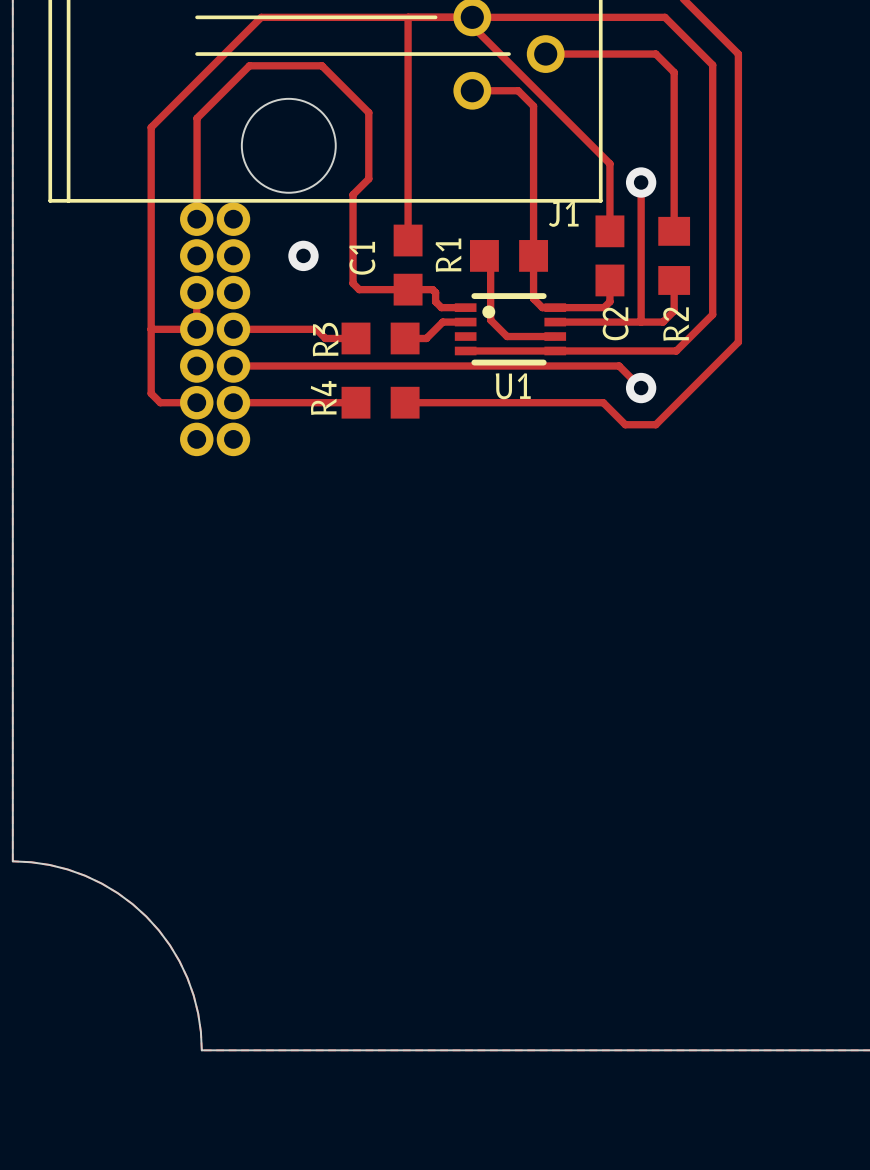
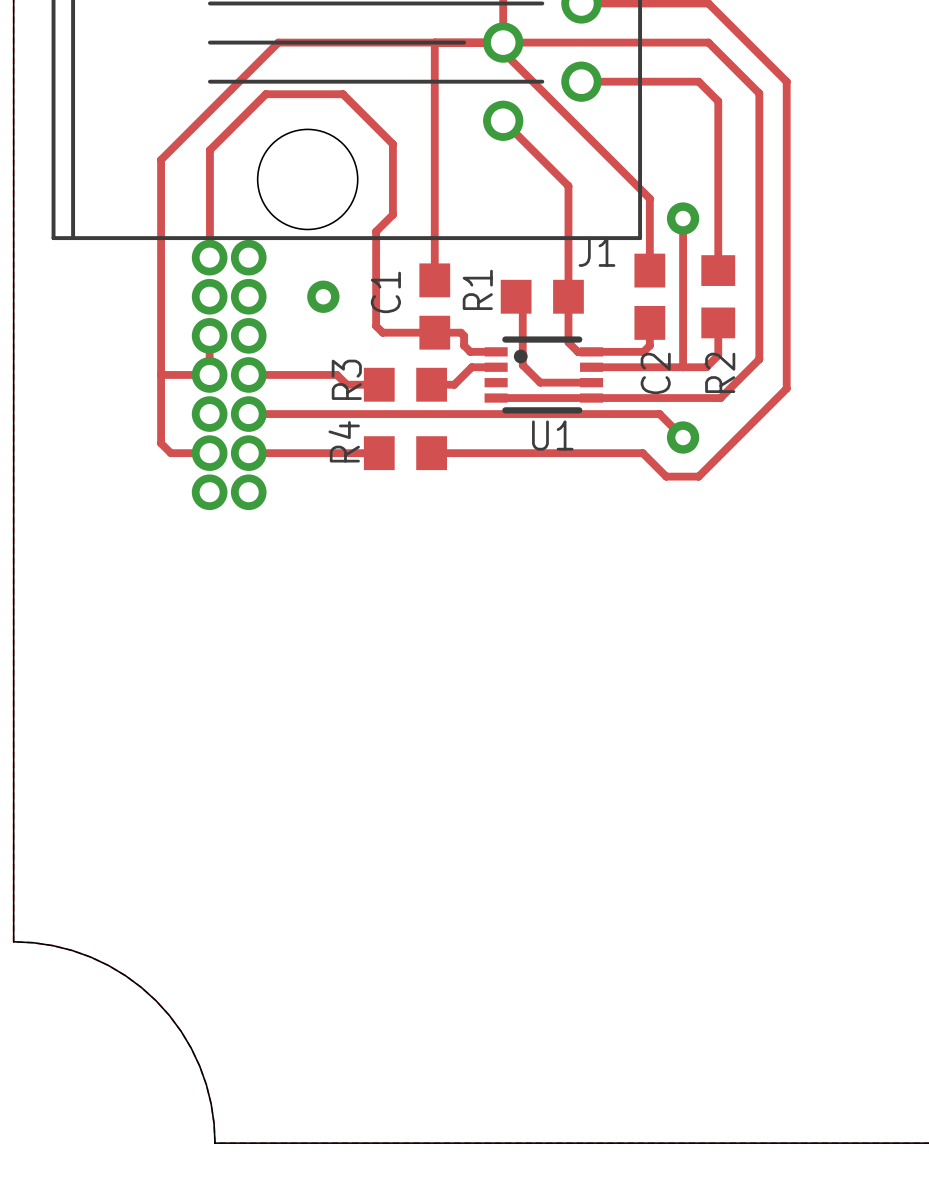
track: (472, 90) (518, 90) (533, 106) (533, 152) -> (503, 120) (568, 186)

